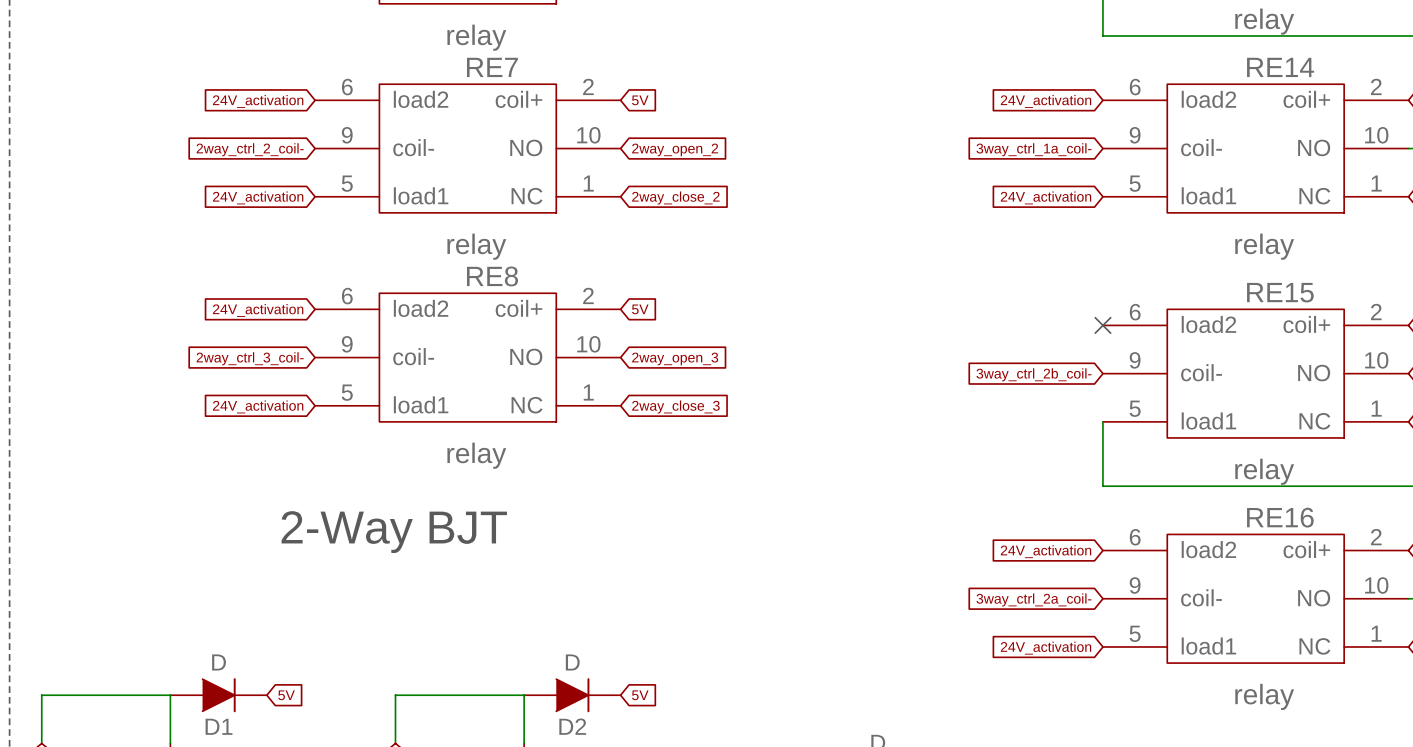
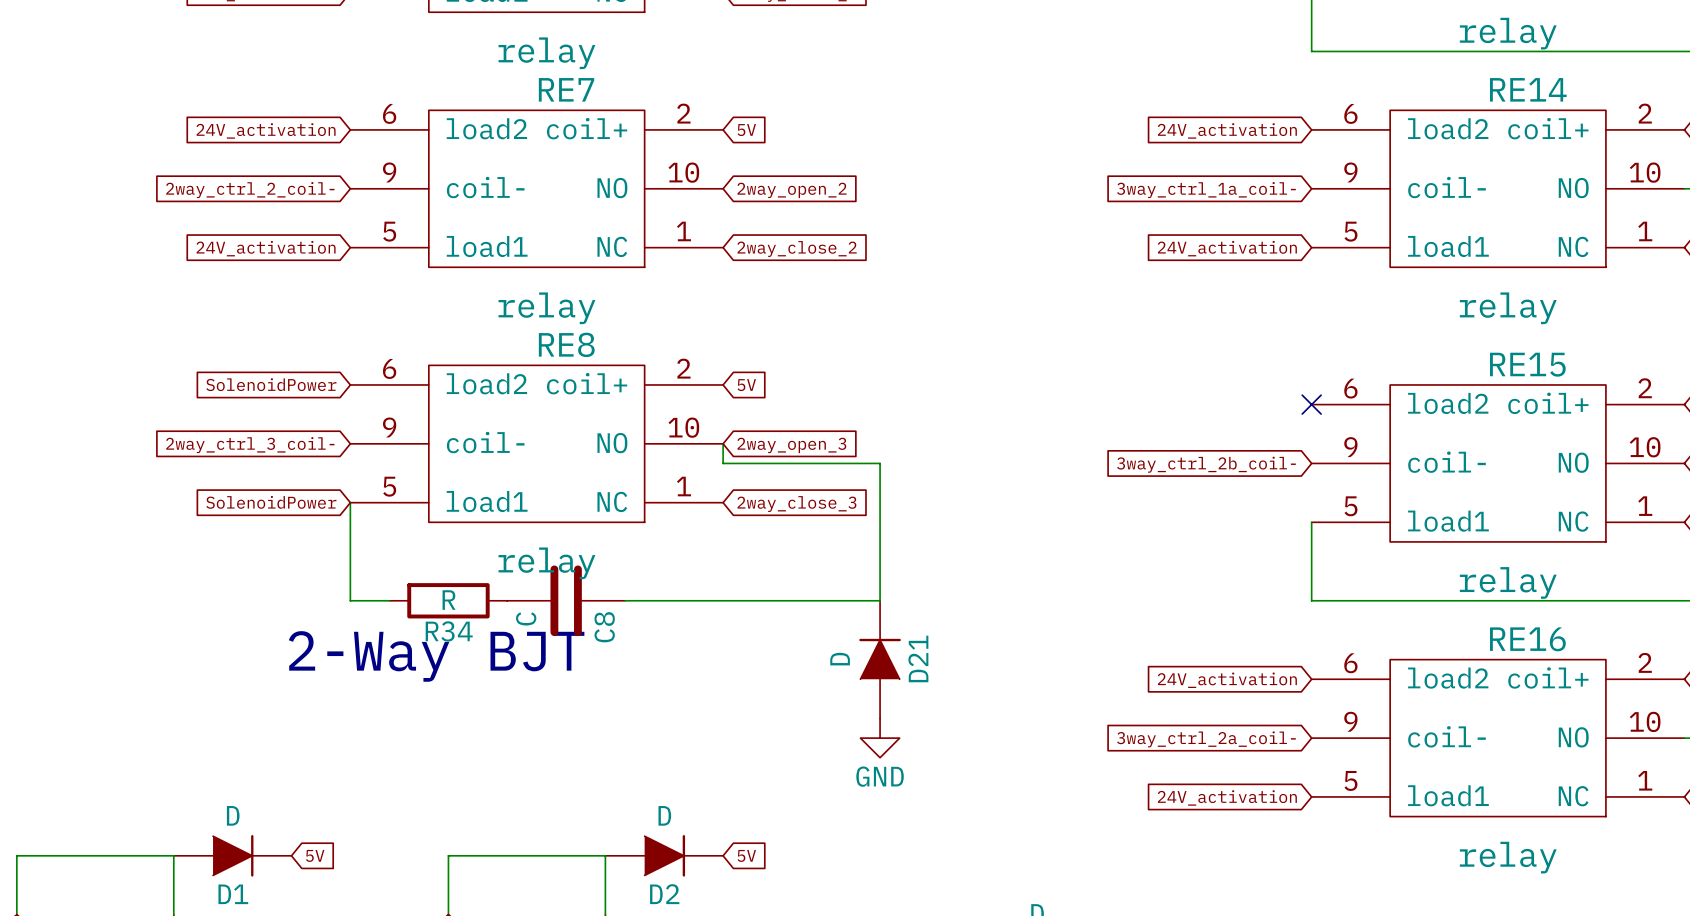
global label: 24V_activation (258, 310) -> SolenoidPower (271, 384)
wire: none -> (723, 443) (723, 463) (880, 463) (880, 600) (625, 600)
wire: none -> (350, 502) (350, 600) (389, 600)
global label: 24V_activation (258, 406) -> SolenoidPower (271, 502)
R34: none -> R (448, 600)
C8: none -> C (566, 600)
D21: none -> D (880, 659)
power symbol: none -> GND (880, 738)

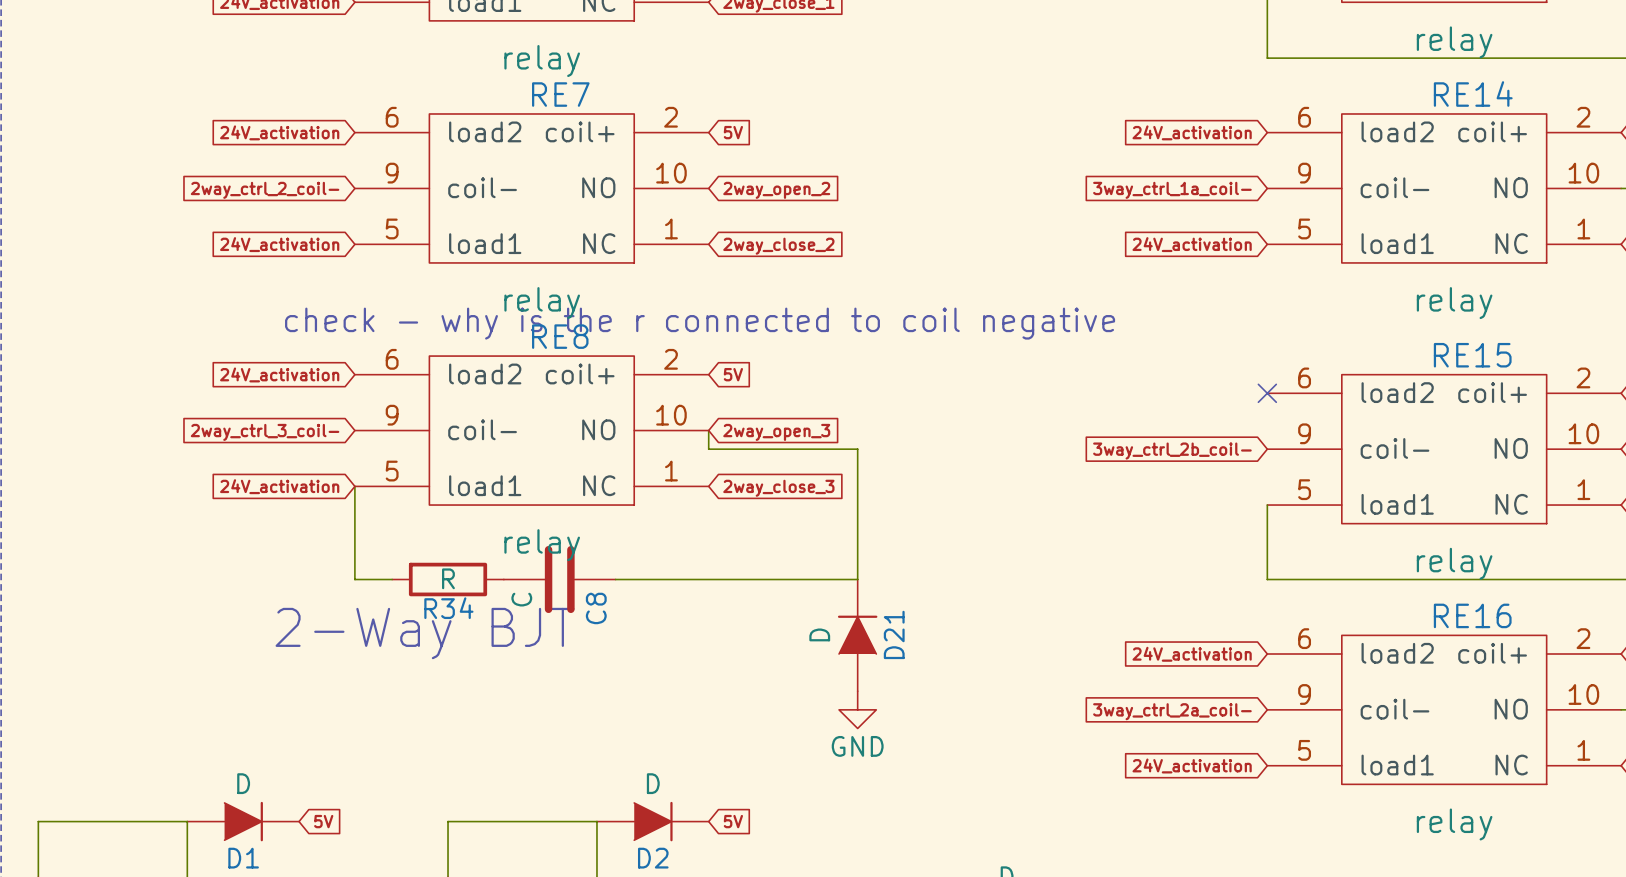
text: none -> check - why is the r connected to coil negative (700, 323)
global label: SolenoidPower (271, 384) -> 24V_activation (279, 374)
global label: SolenoidPower (271, 502) -> 24V_activation (279, 486)

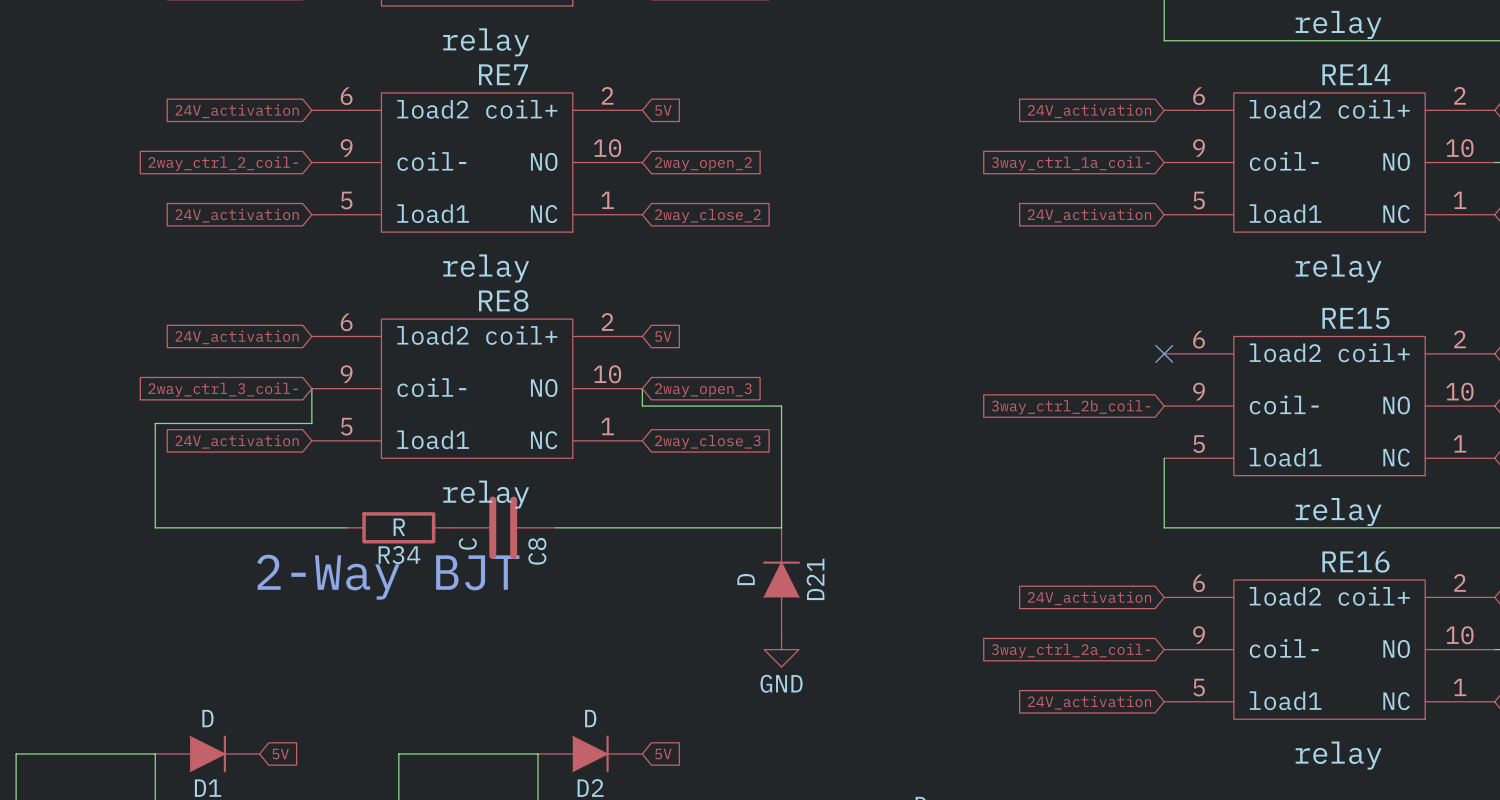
text: check - why is the r connected to coil negative (700, 323) -> none
wire: (354, 486) (354, 579) -> (311, 388) (311, 423) (155, 423) (155, 527) (311, 527)

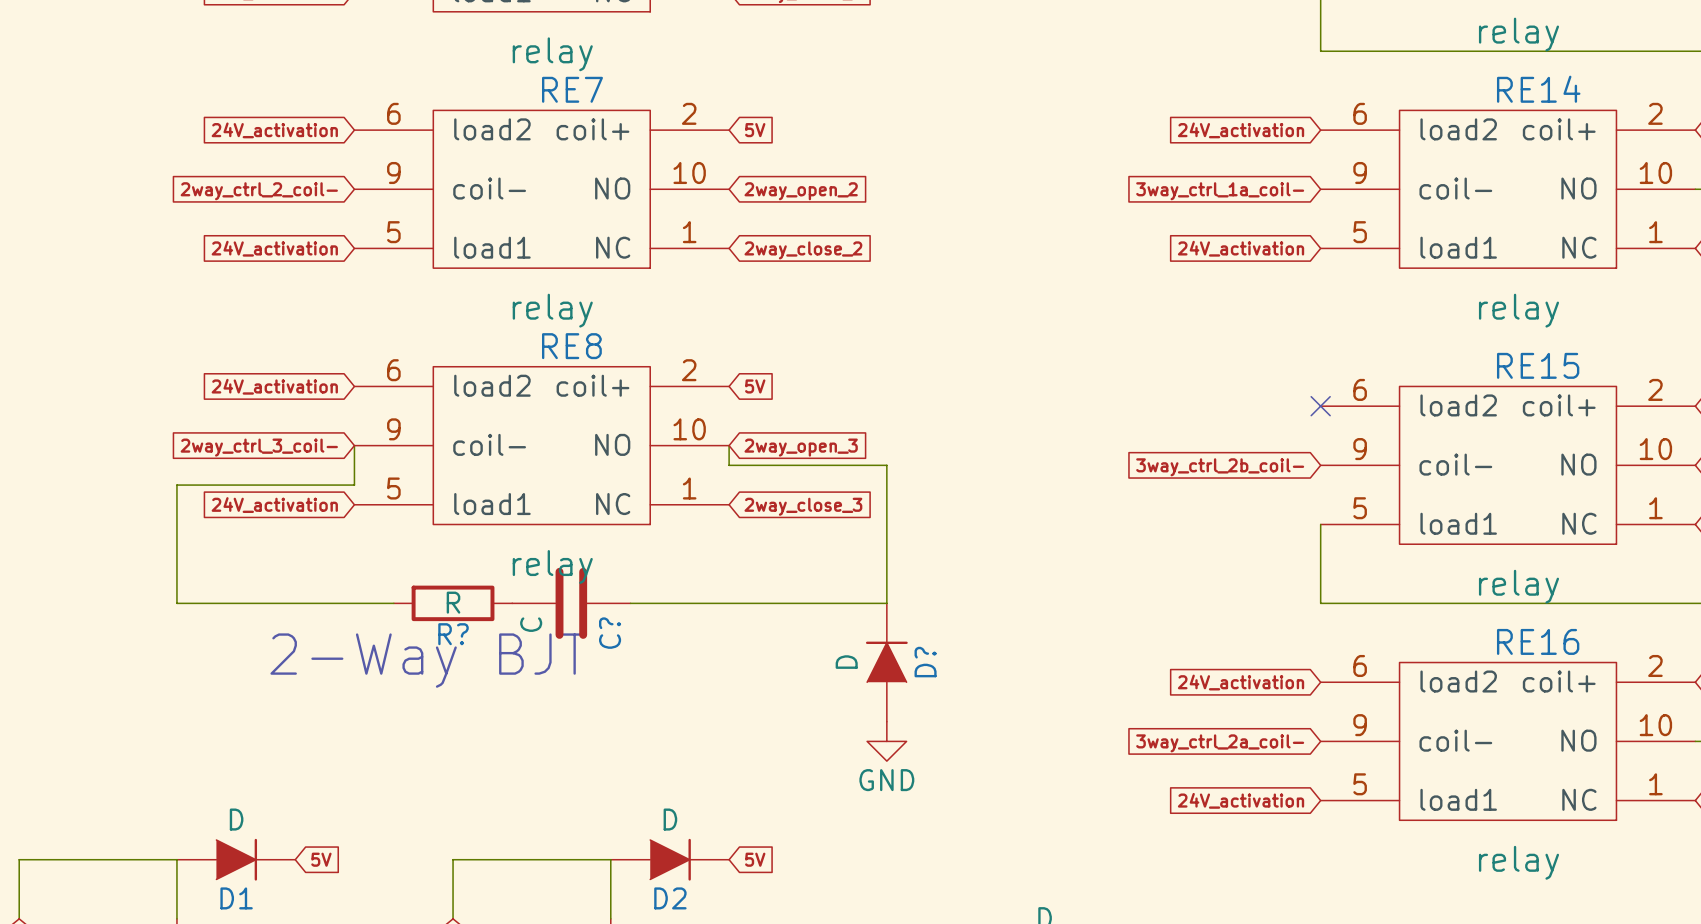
C8 name: C8 (537, 551) -> C? (610, 633)
R34 name: R34 (399, 555) -> R? (453, 634)
D21 name: D21 (815, 579) -> D? (925, 662)

